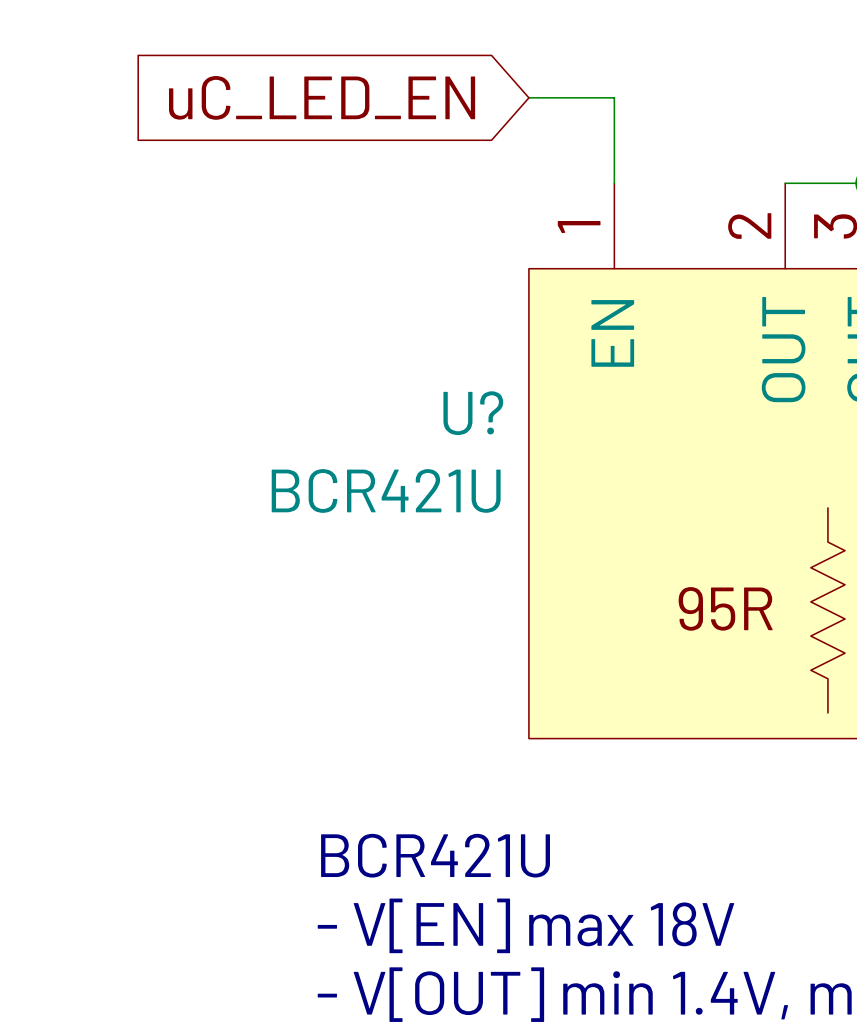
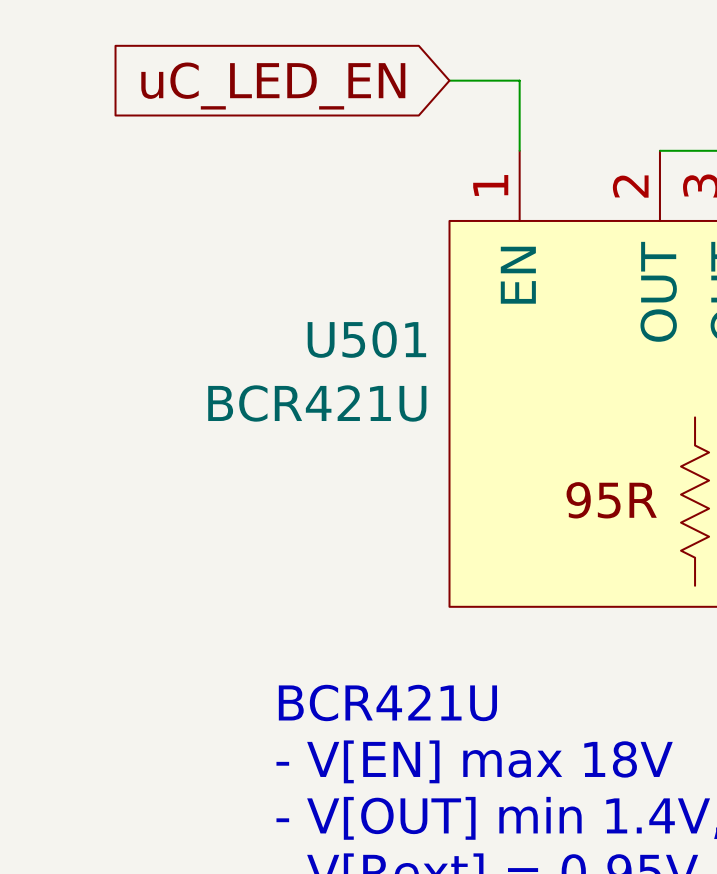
U? name: U? (473, 413) -> U501 (366, 339)

